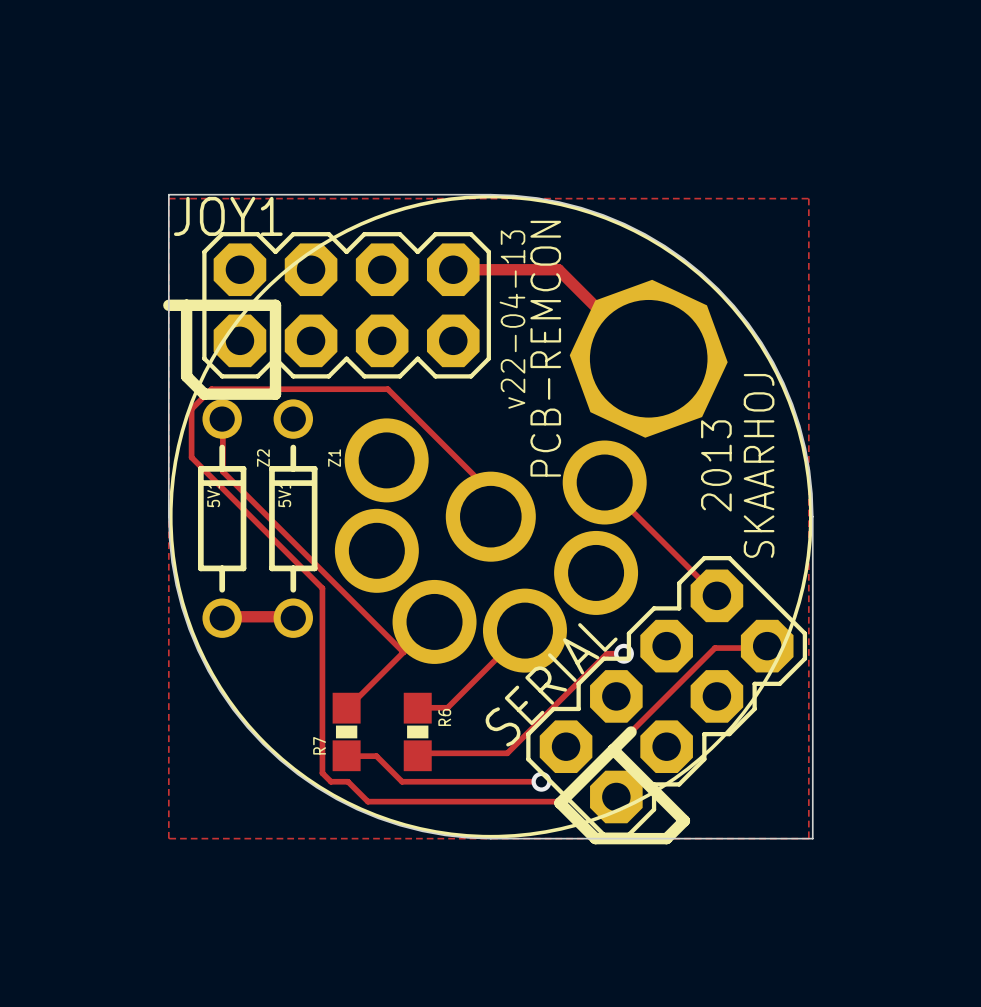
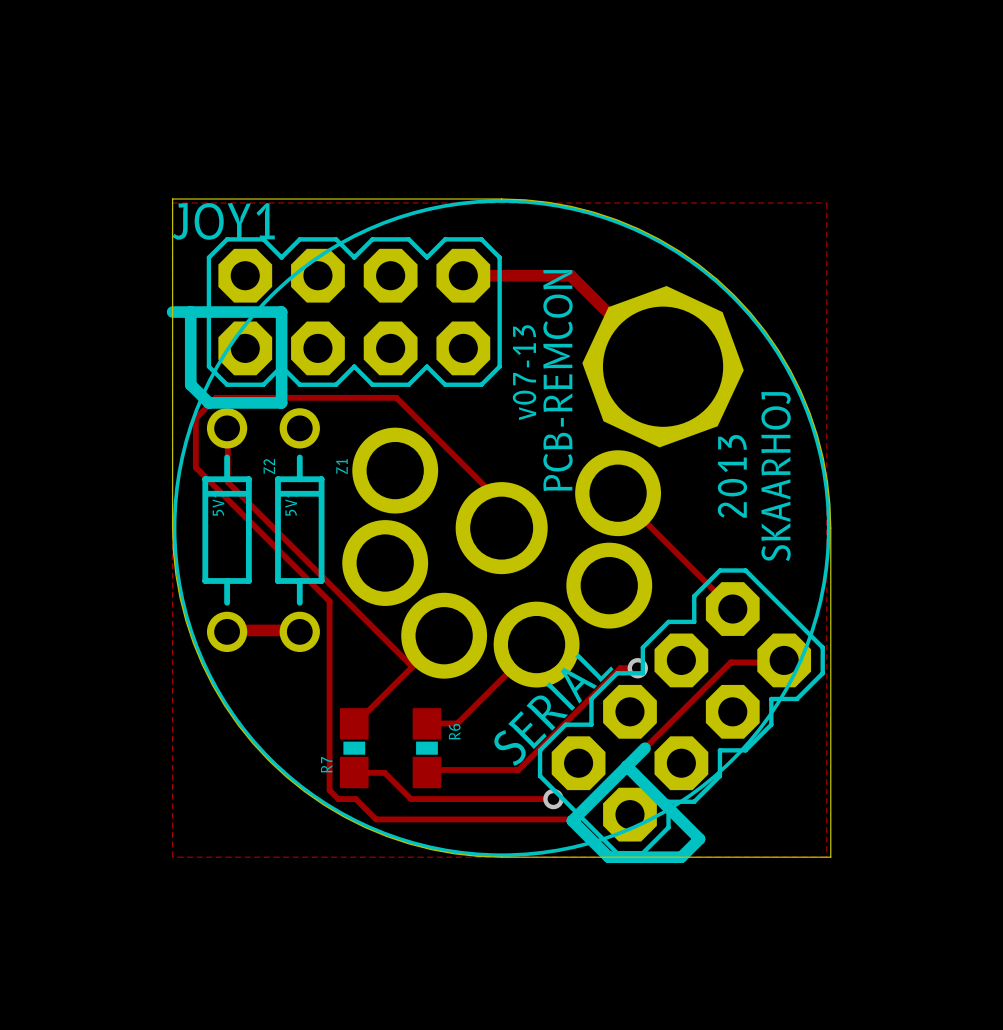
text: v22-04-13 (512, 319) -> v07-13 (524, 372)

